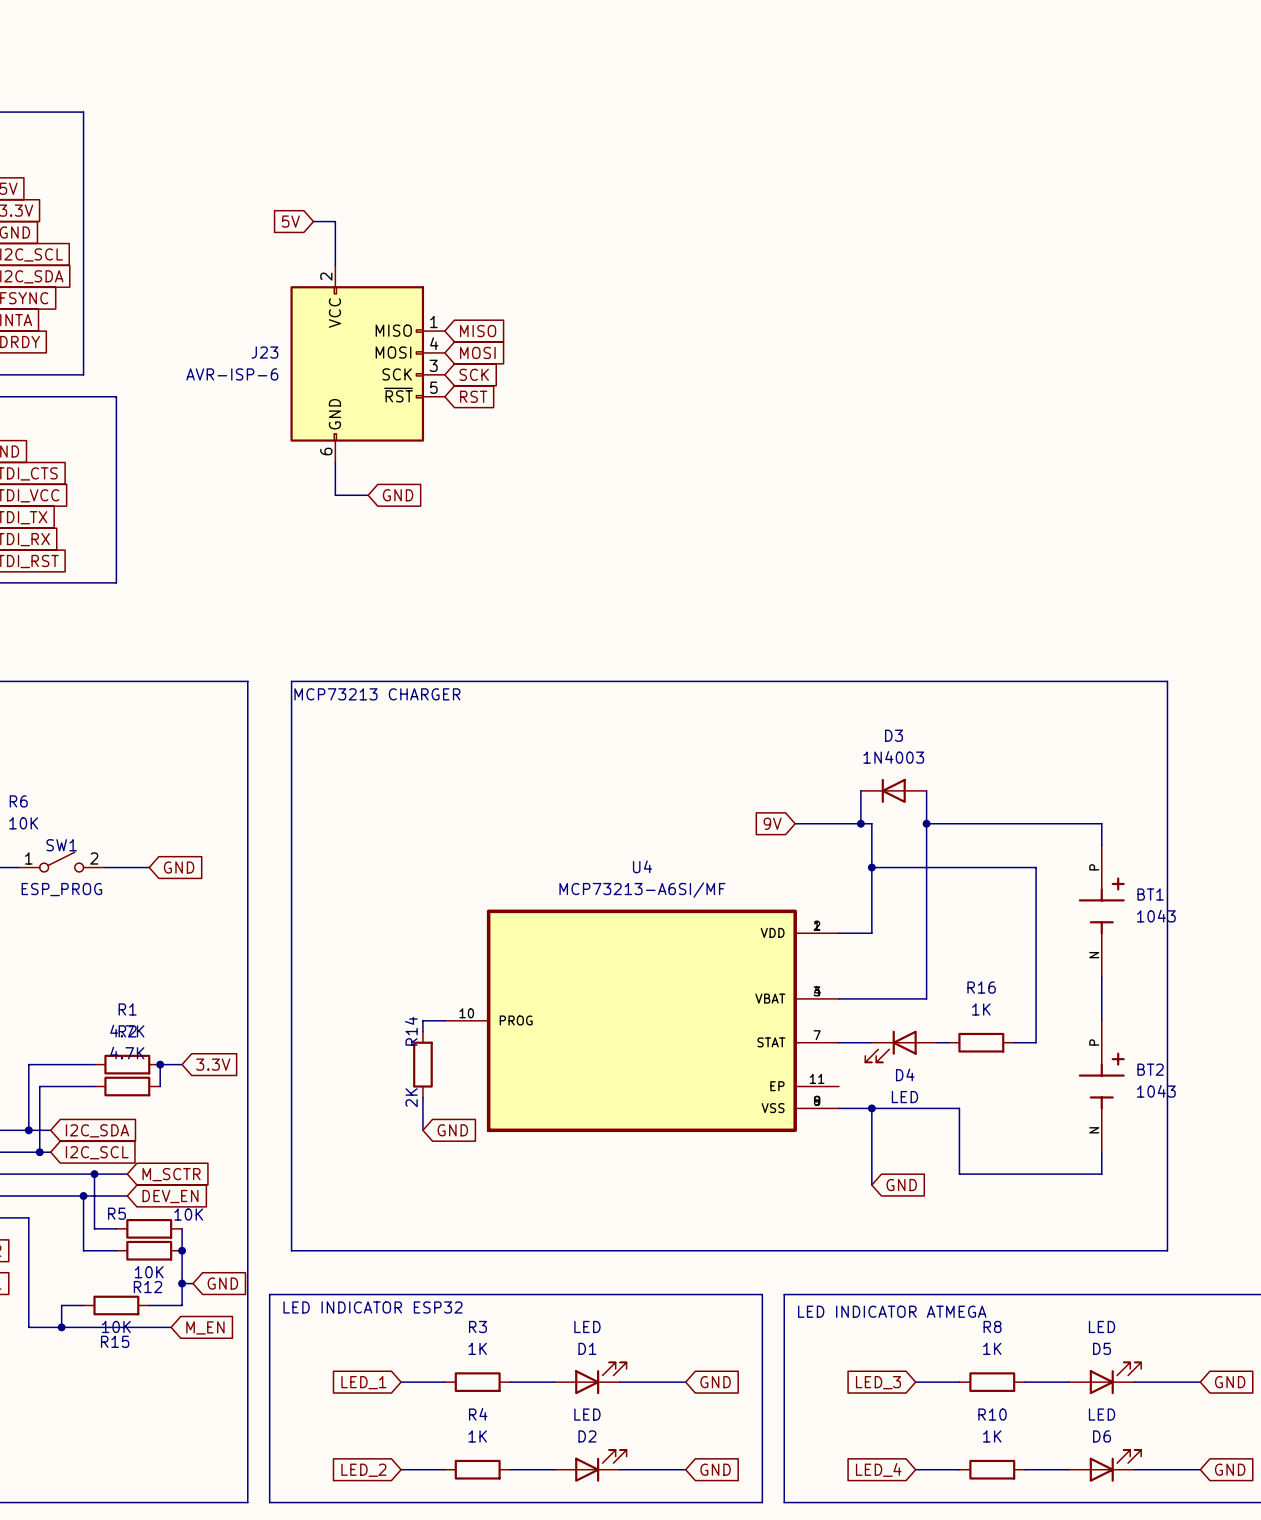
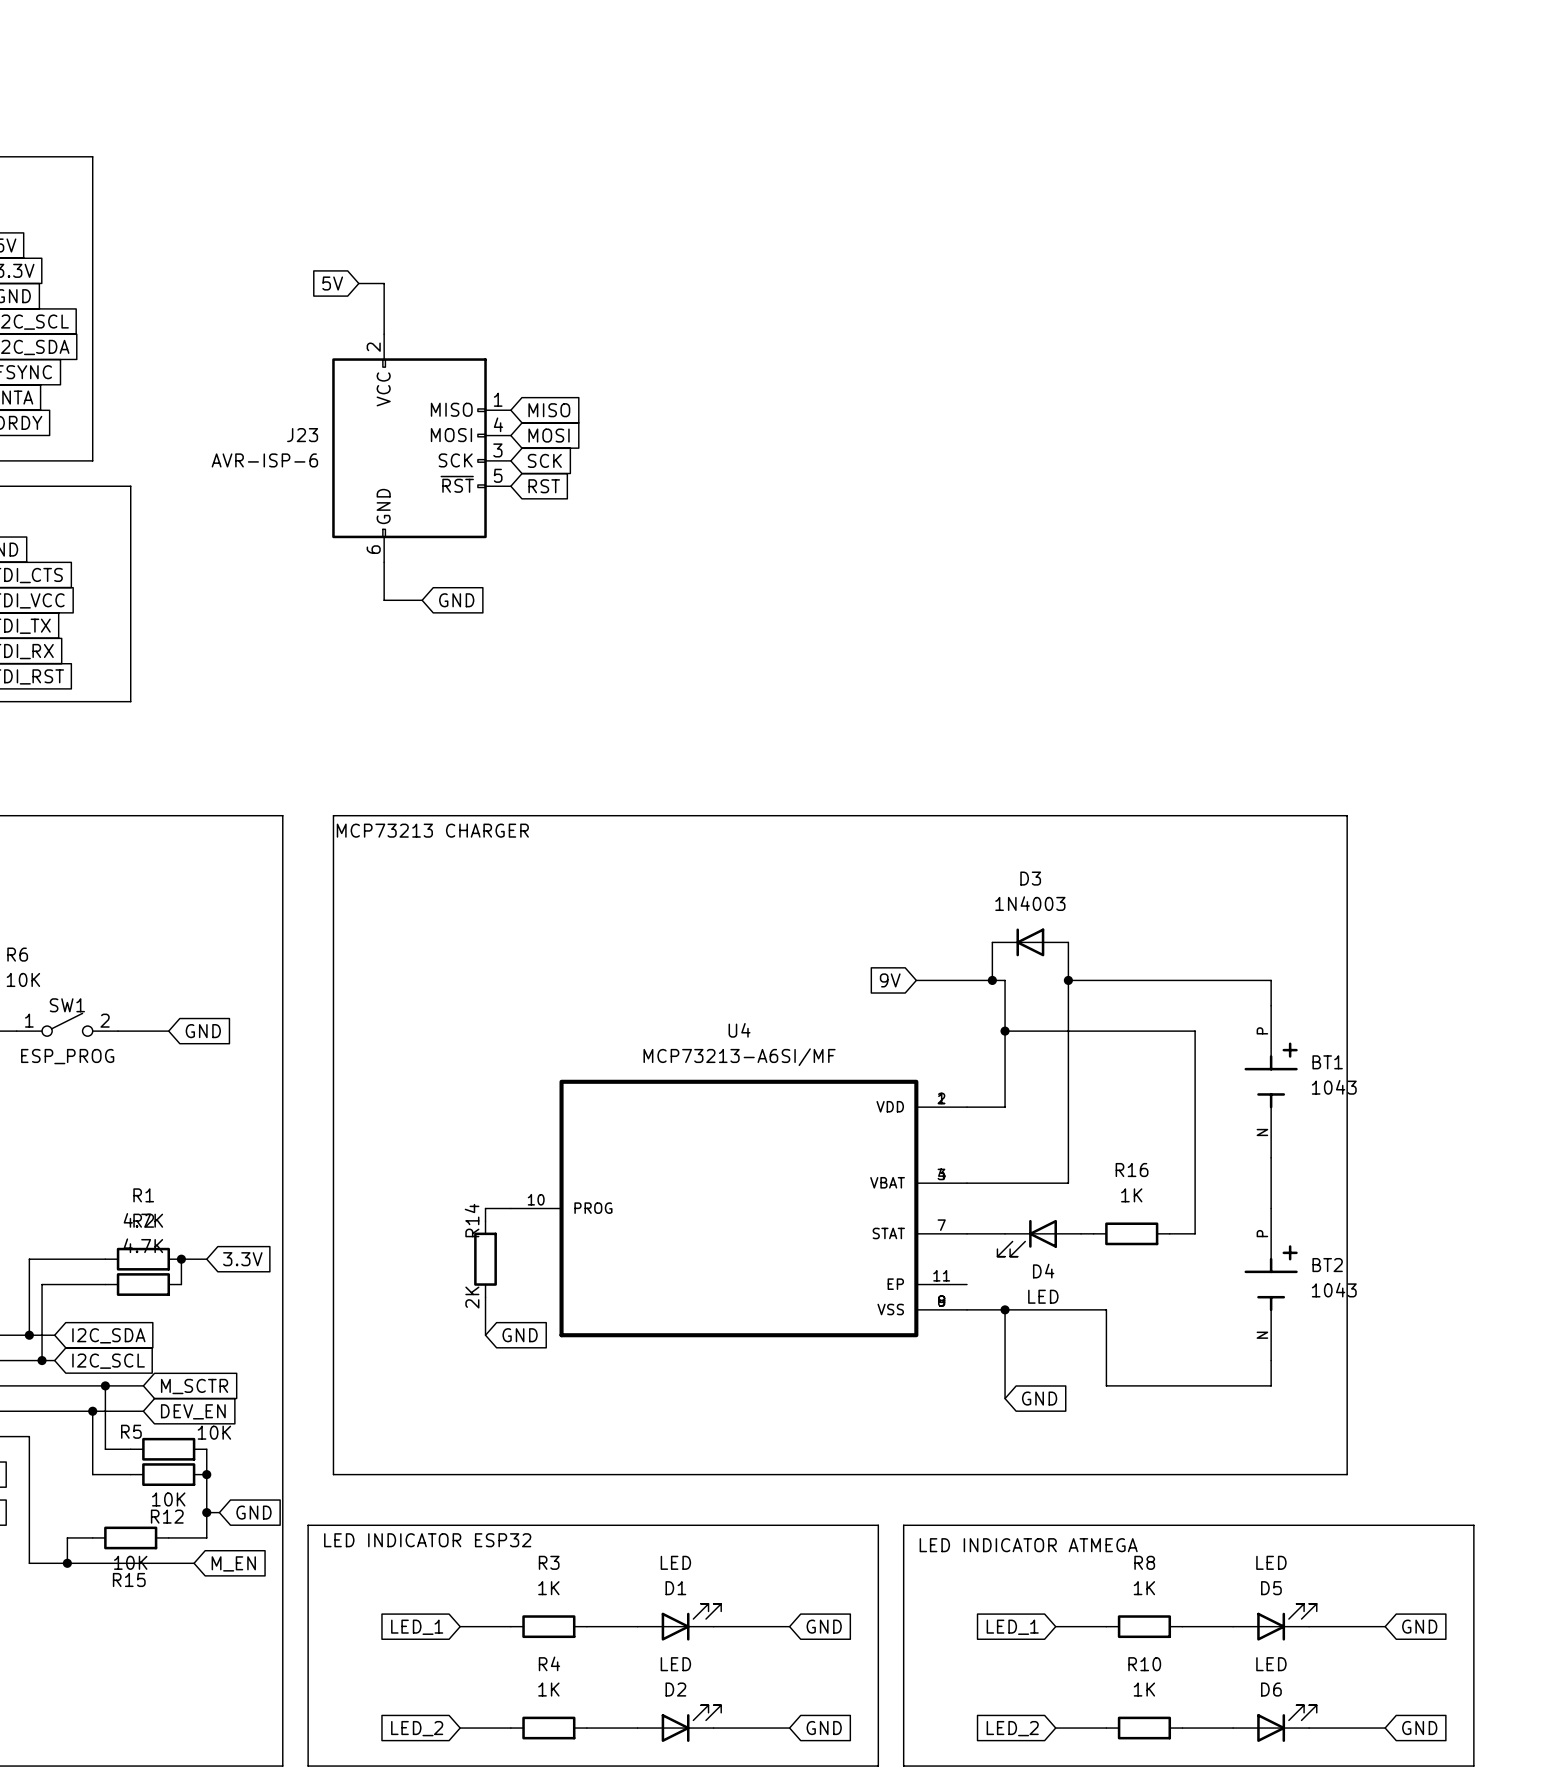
global label: LED_3 (878, 1382) -> LED_1 (1012, 1627)
global label: LED_4 (878, 1469) -> LED_2 (1012, 1728)

